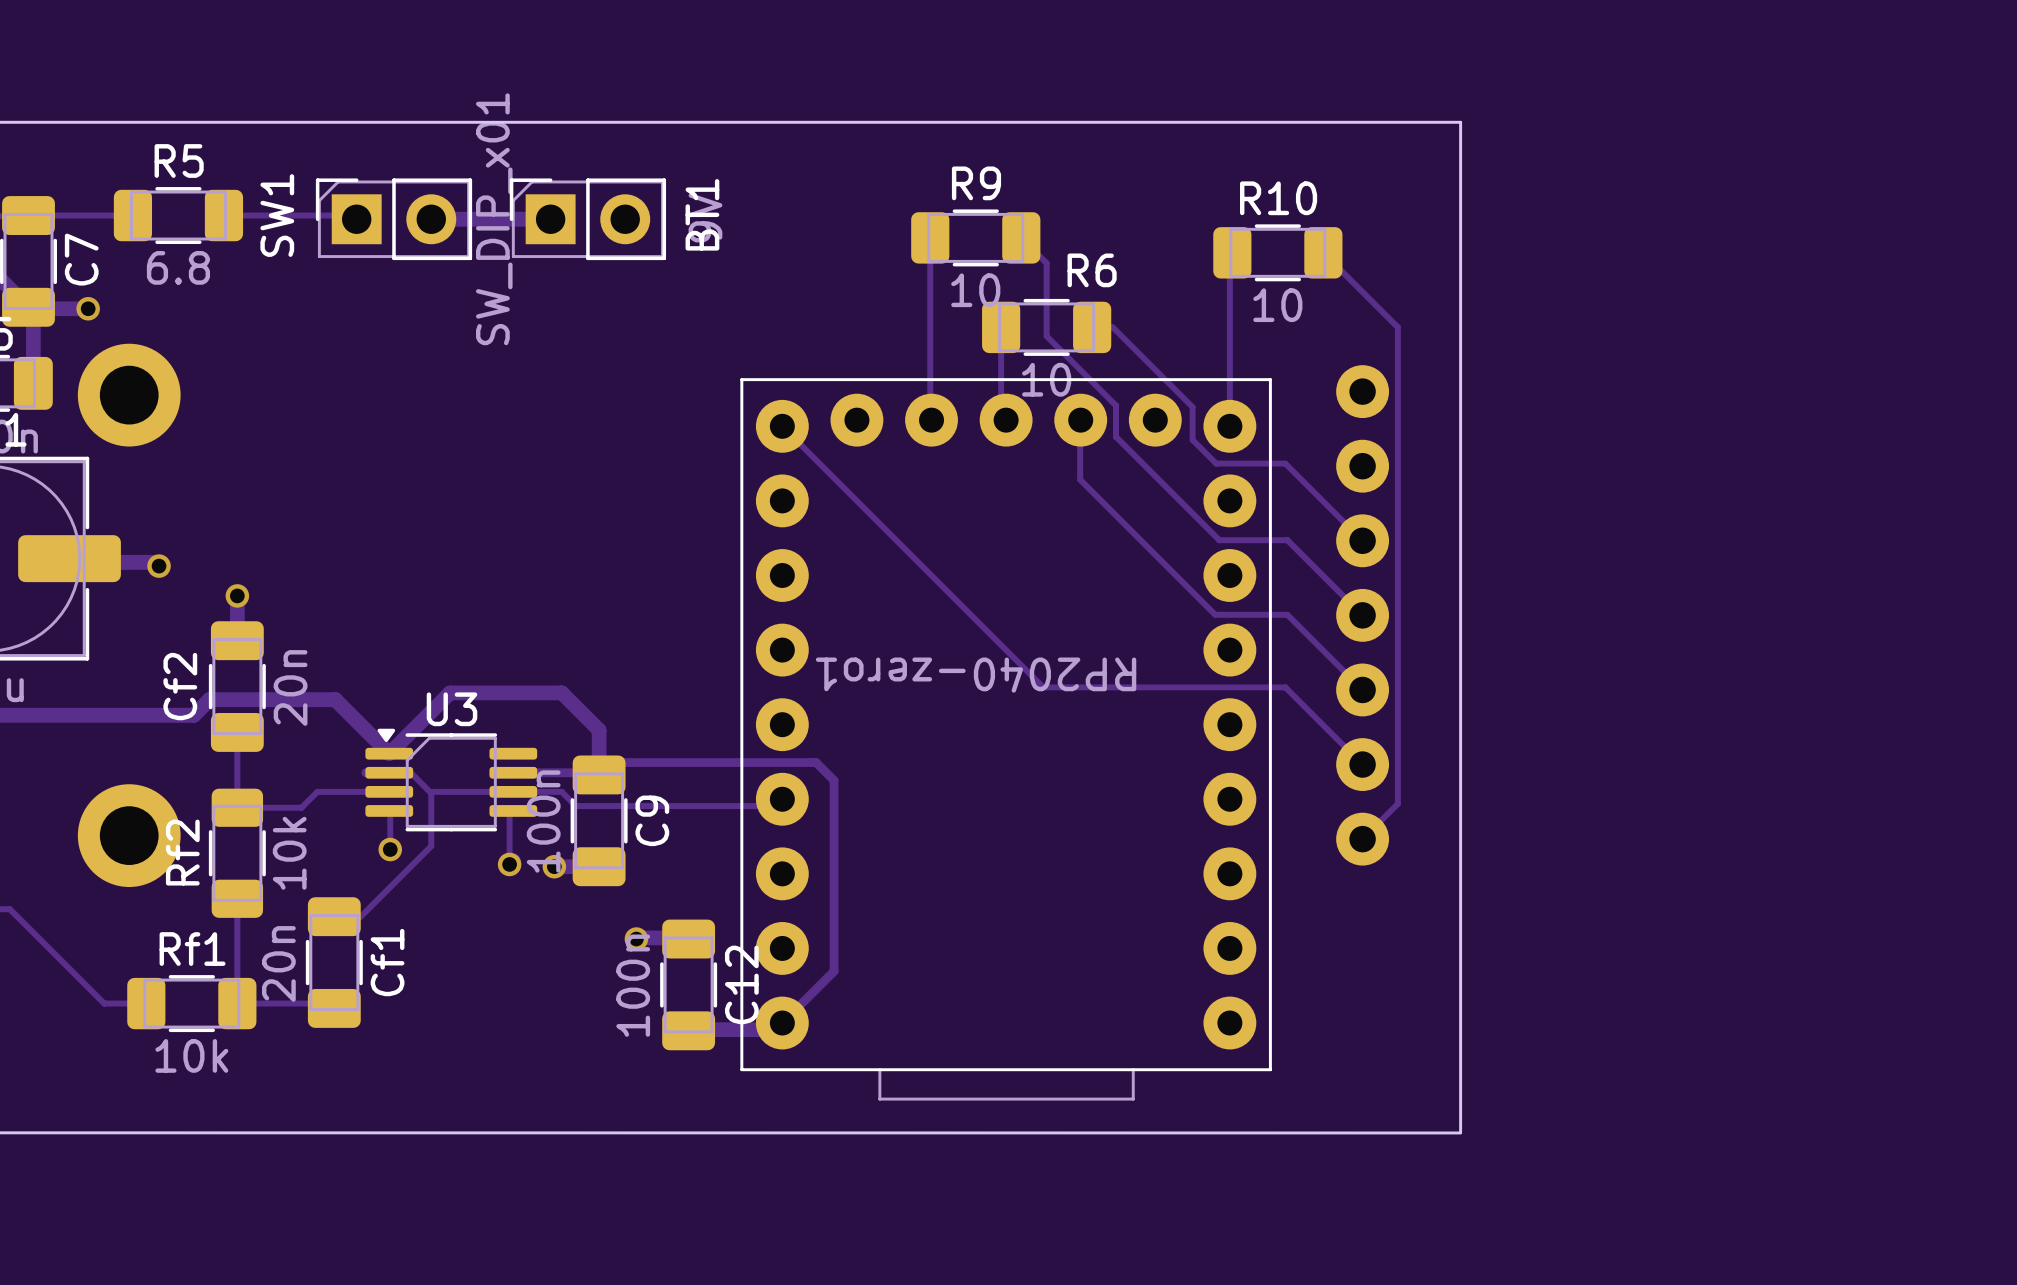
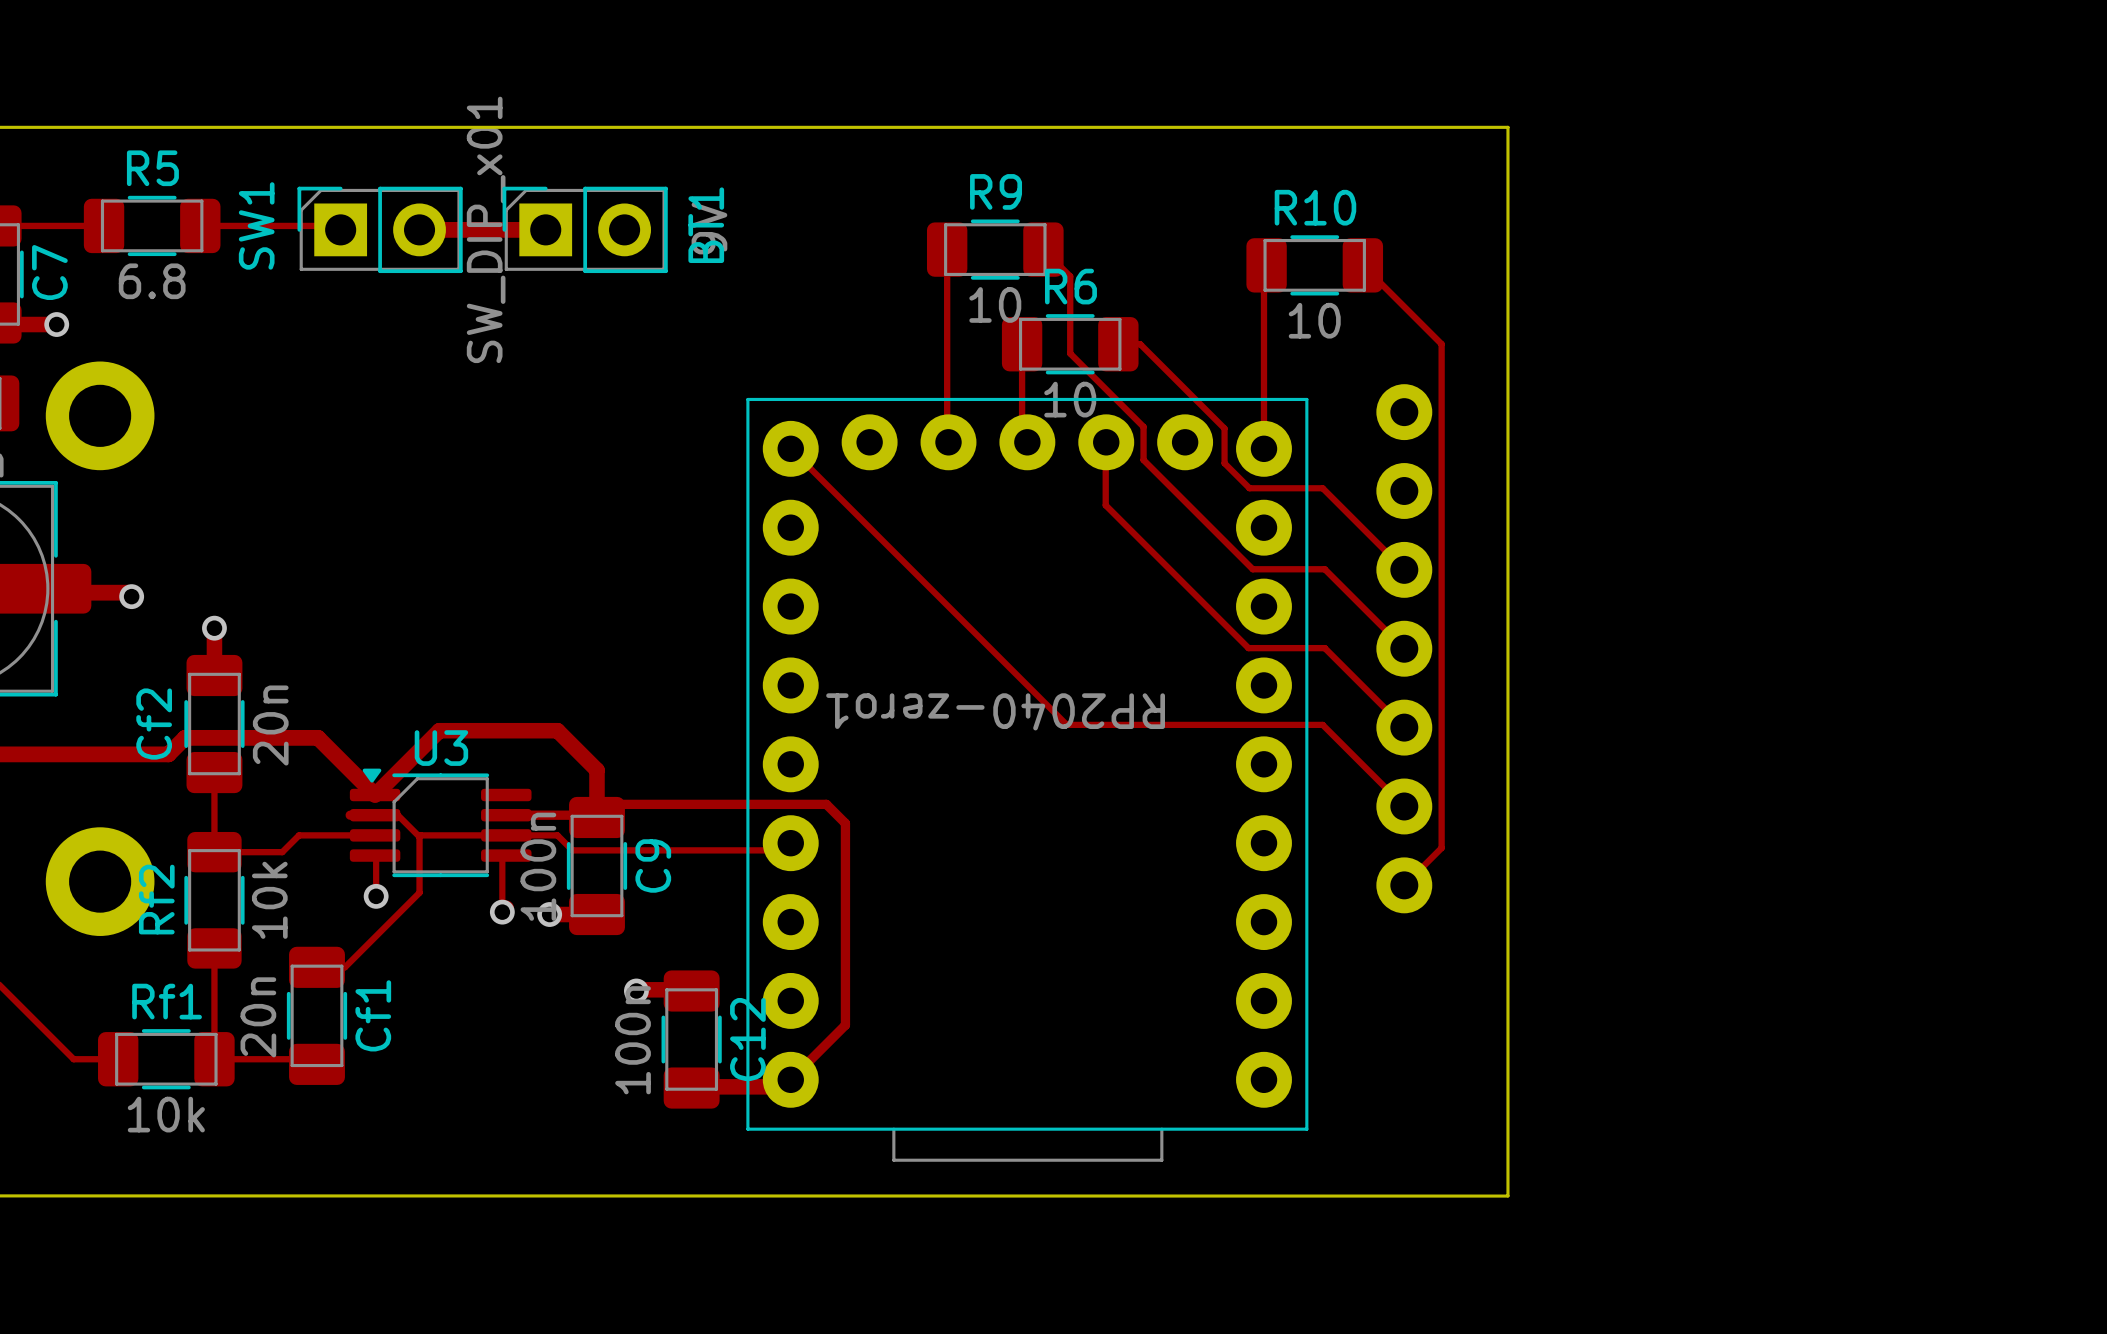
R6 name position: R6 (1092, 270) -> R6 (1070, 286)

